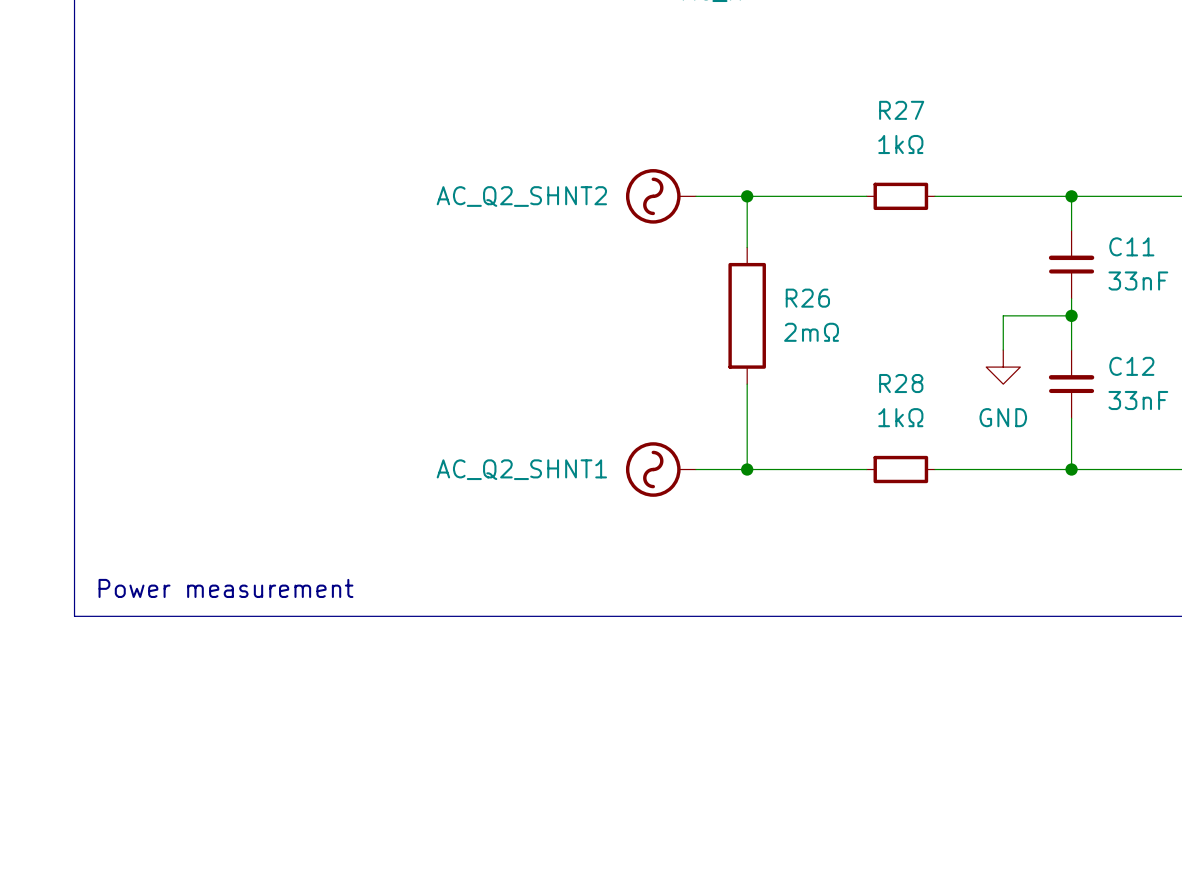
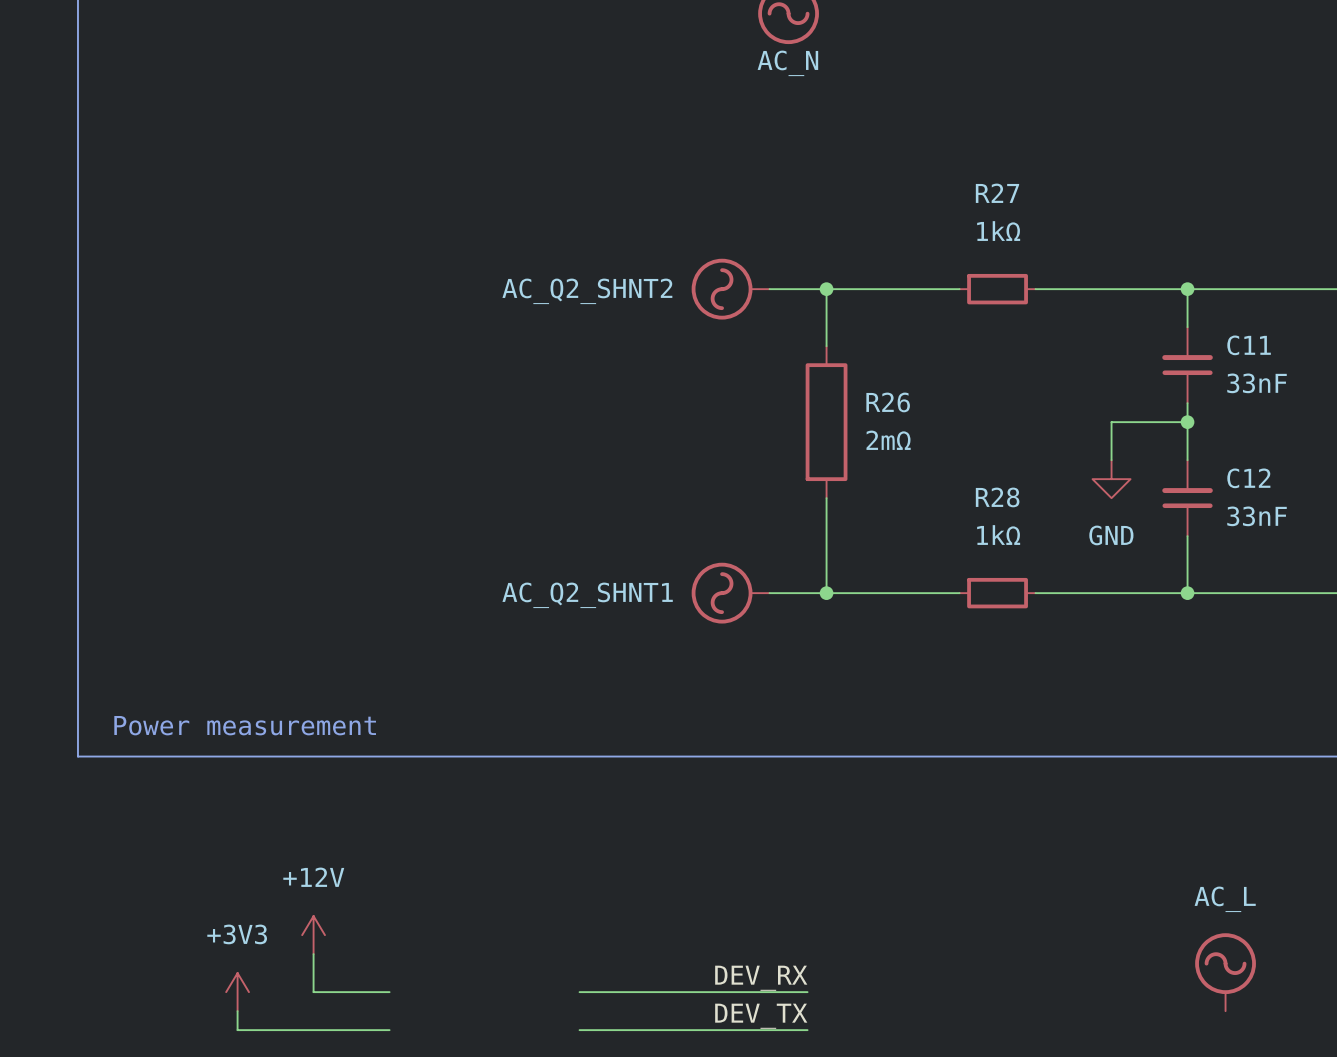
power symbol: none -> +12V (313, 935)
wire: none -> (313, 954) (313, 992) (389, 992)
power symbol: none -> AC_L (1225, 972)
label: none -> DEV_RX (761, 978)
power symbol: none -> +3V3 (237, 992)
wire: none -> (579, 992) (807, 992)
wire: none -> (237, 1011) (237, 1030) (389, 1030)
label: none -> DEV_TX (761, 1016)
wire: none -> (579, 1030) (807, 1030)

